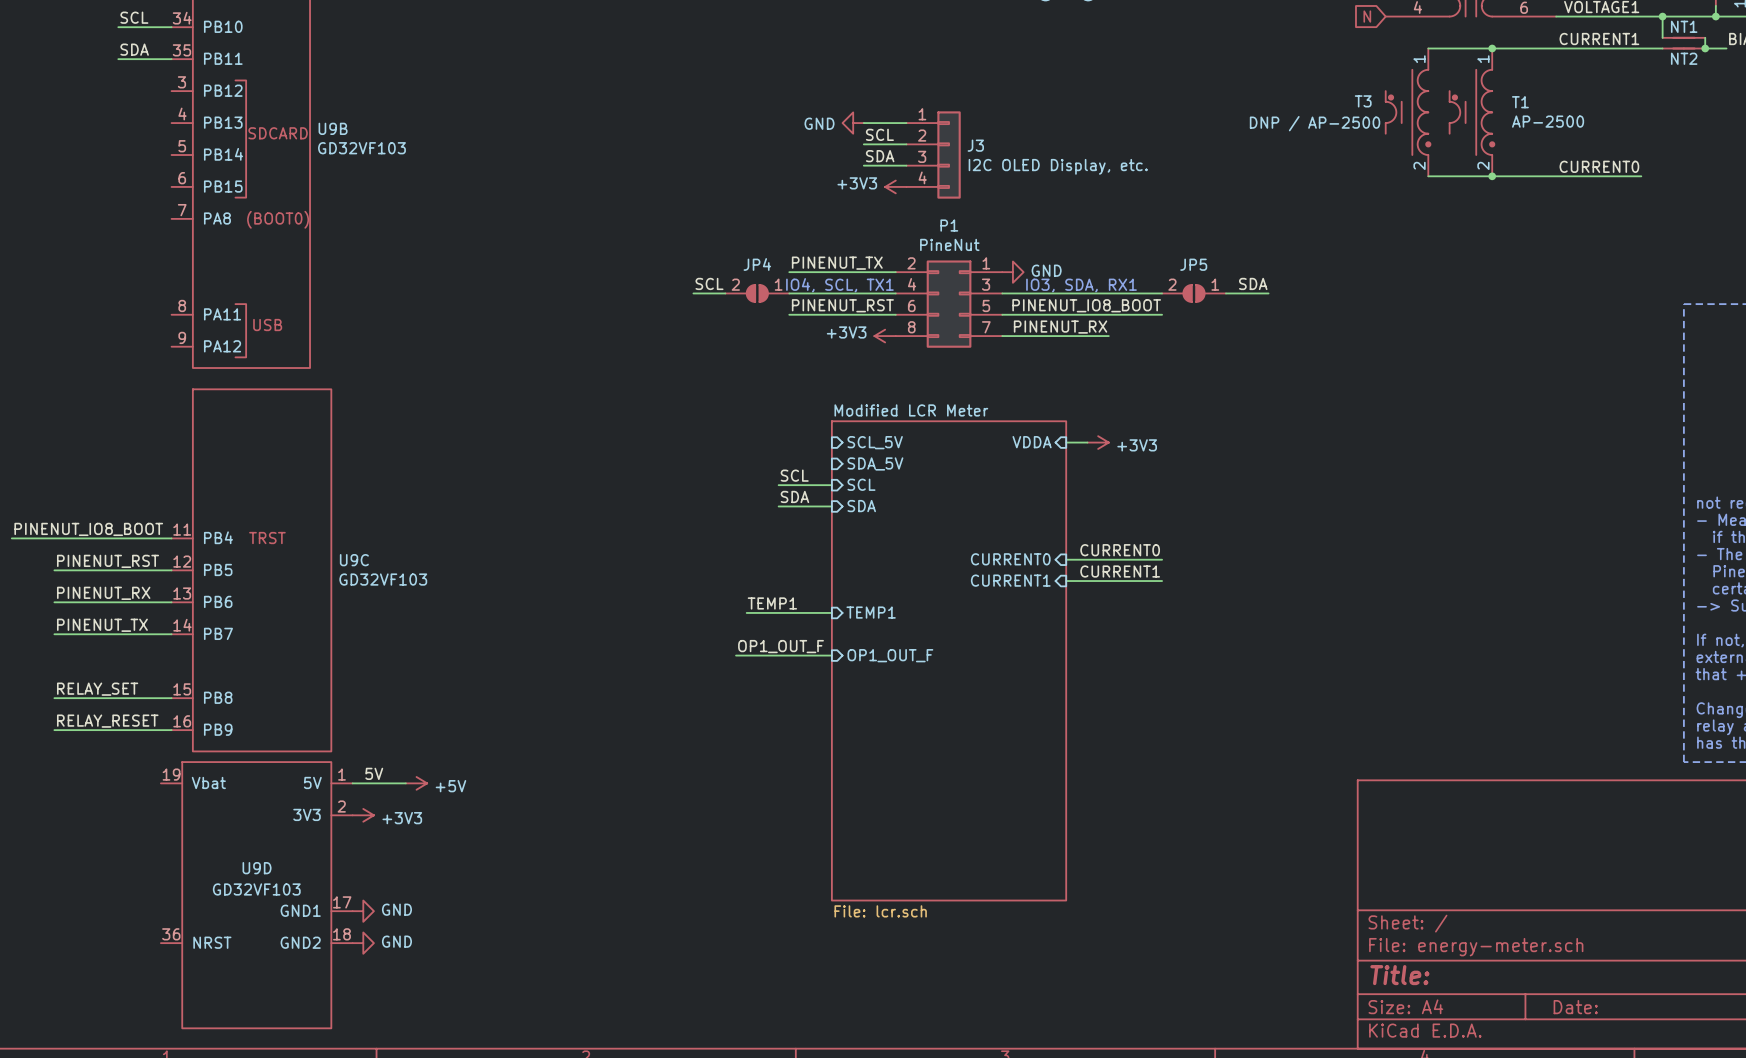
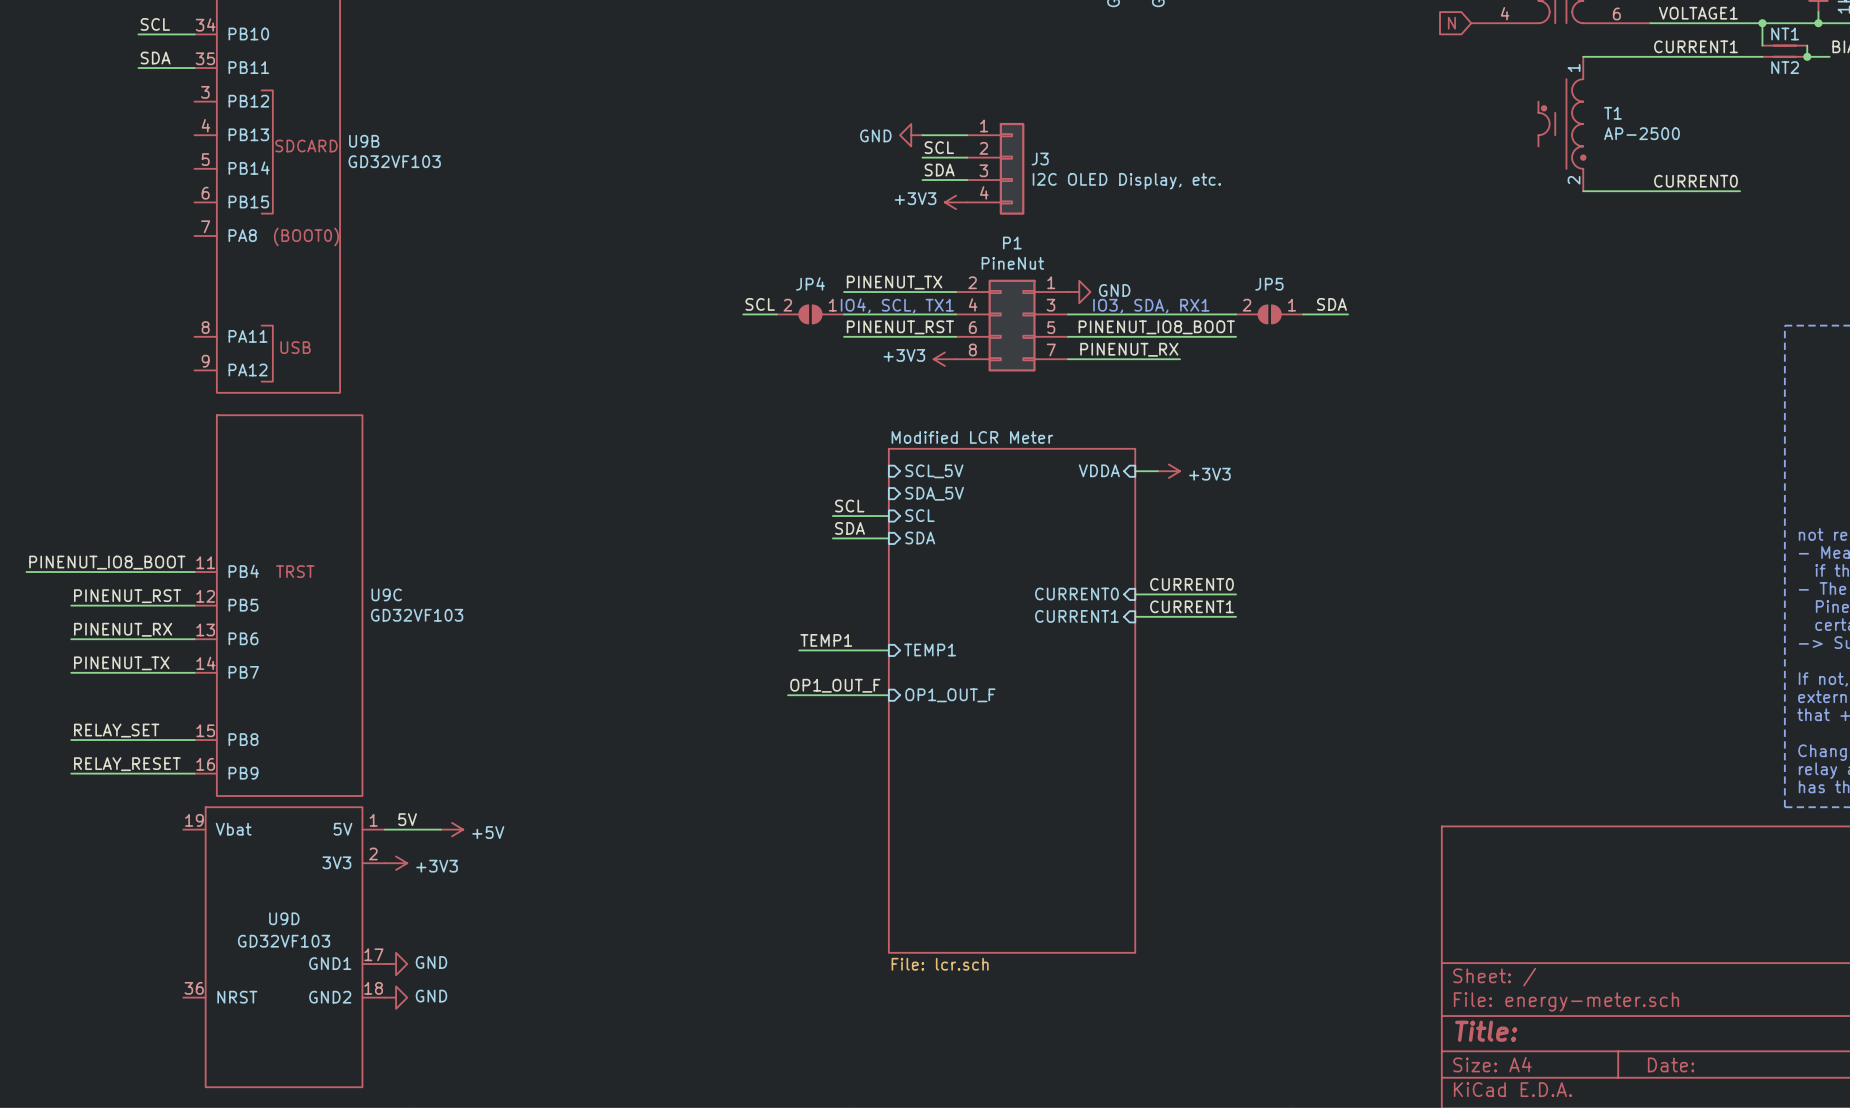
wire: (1428, 48) (1492, 48) -> none
junction: (1492, 48) -> none
T3: DNP / AP-2500 (1408, 112) -> none
wire: (1428, 176) (1492, 176) -> none
junction: (1492, 176) -> none

